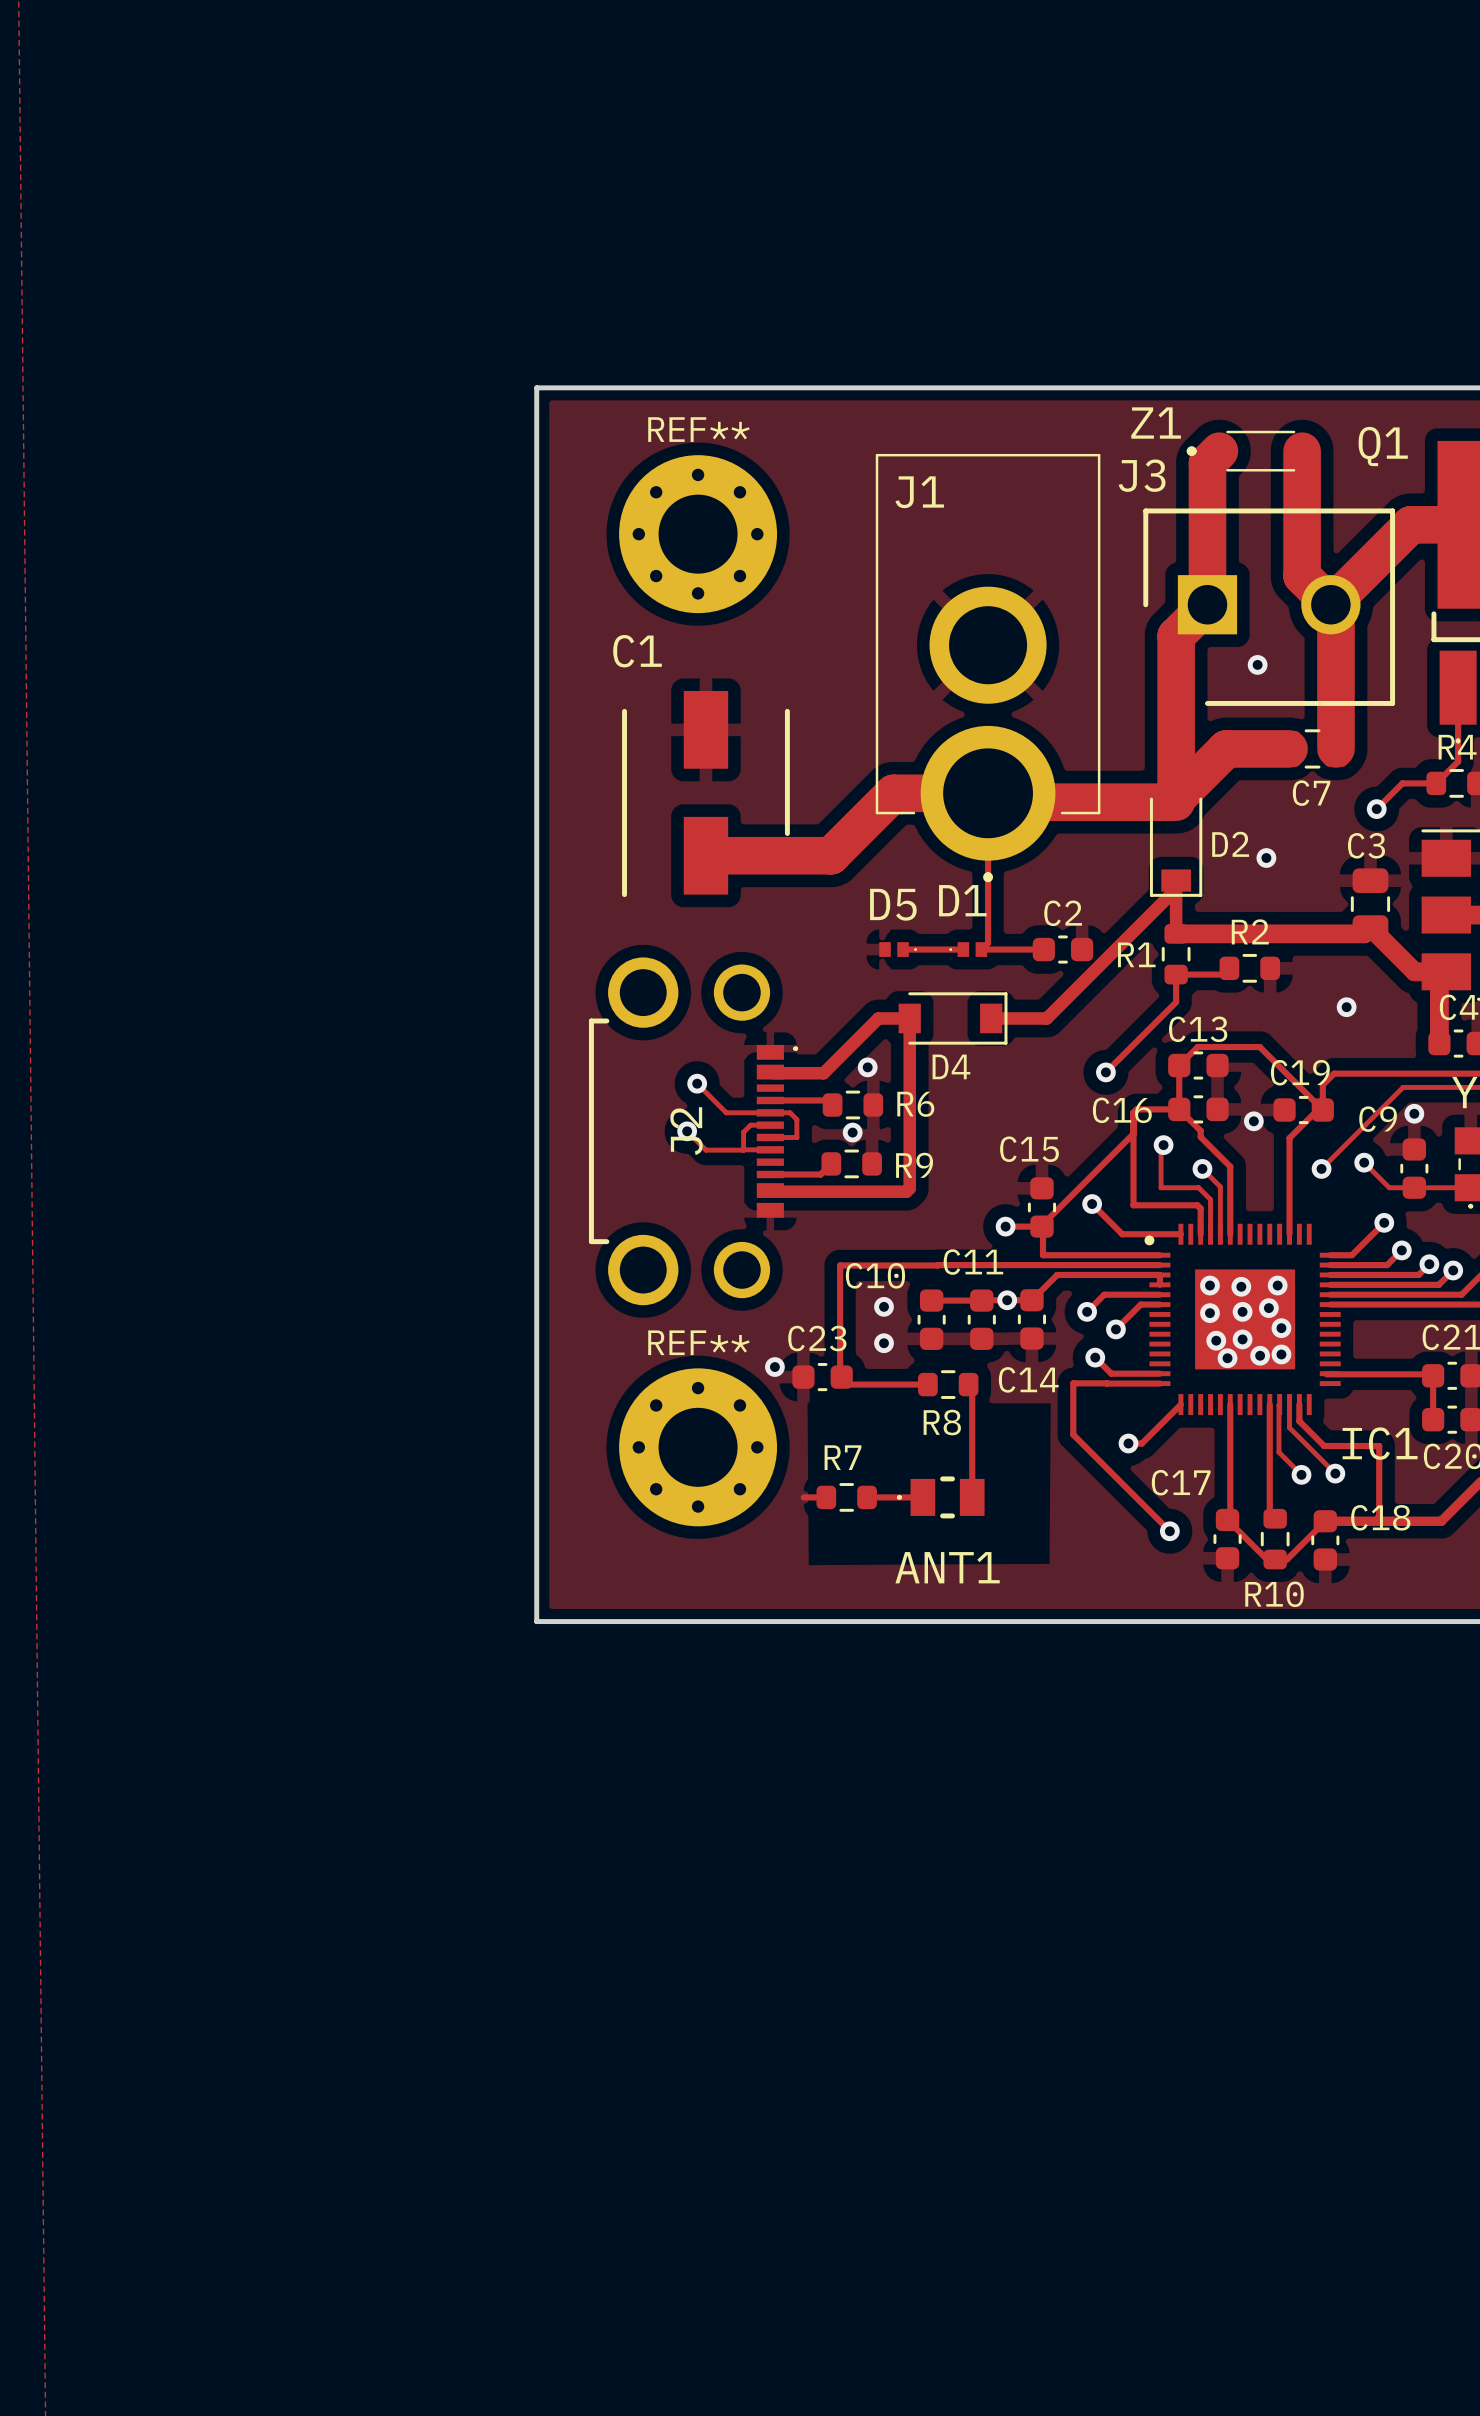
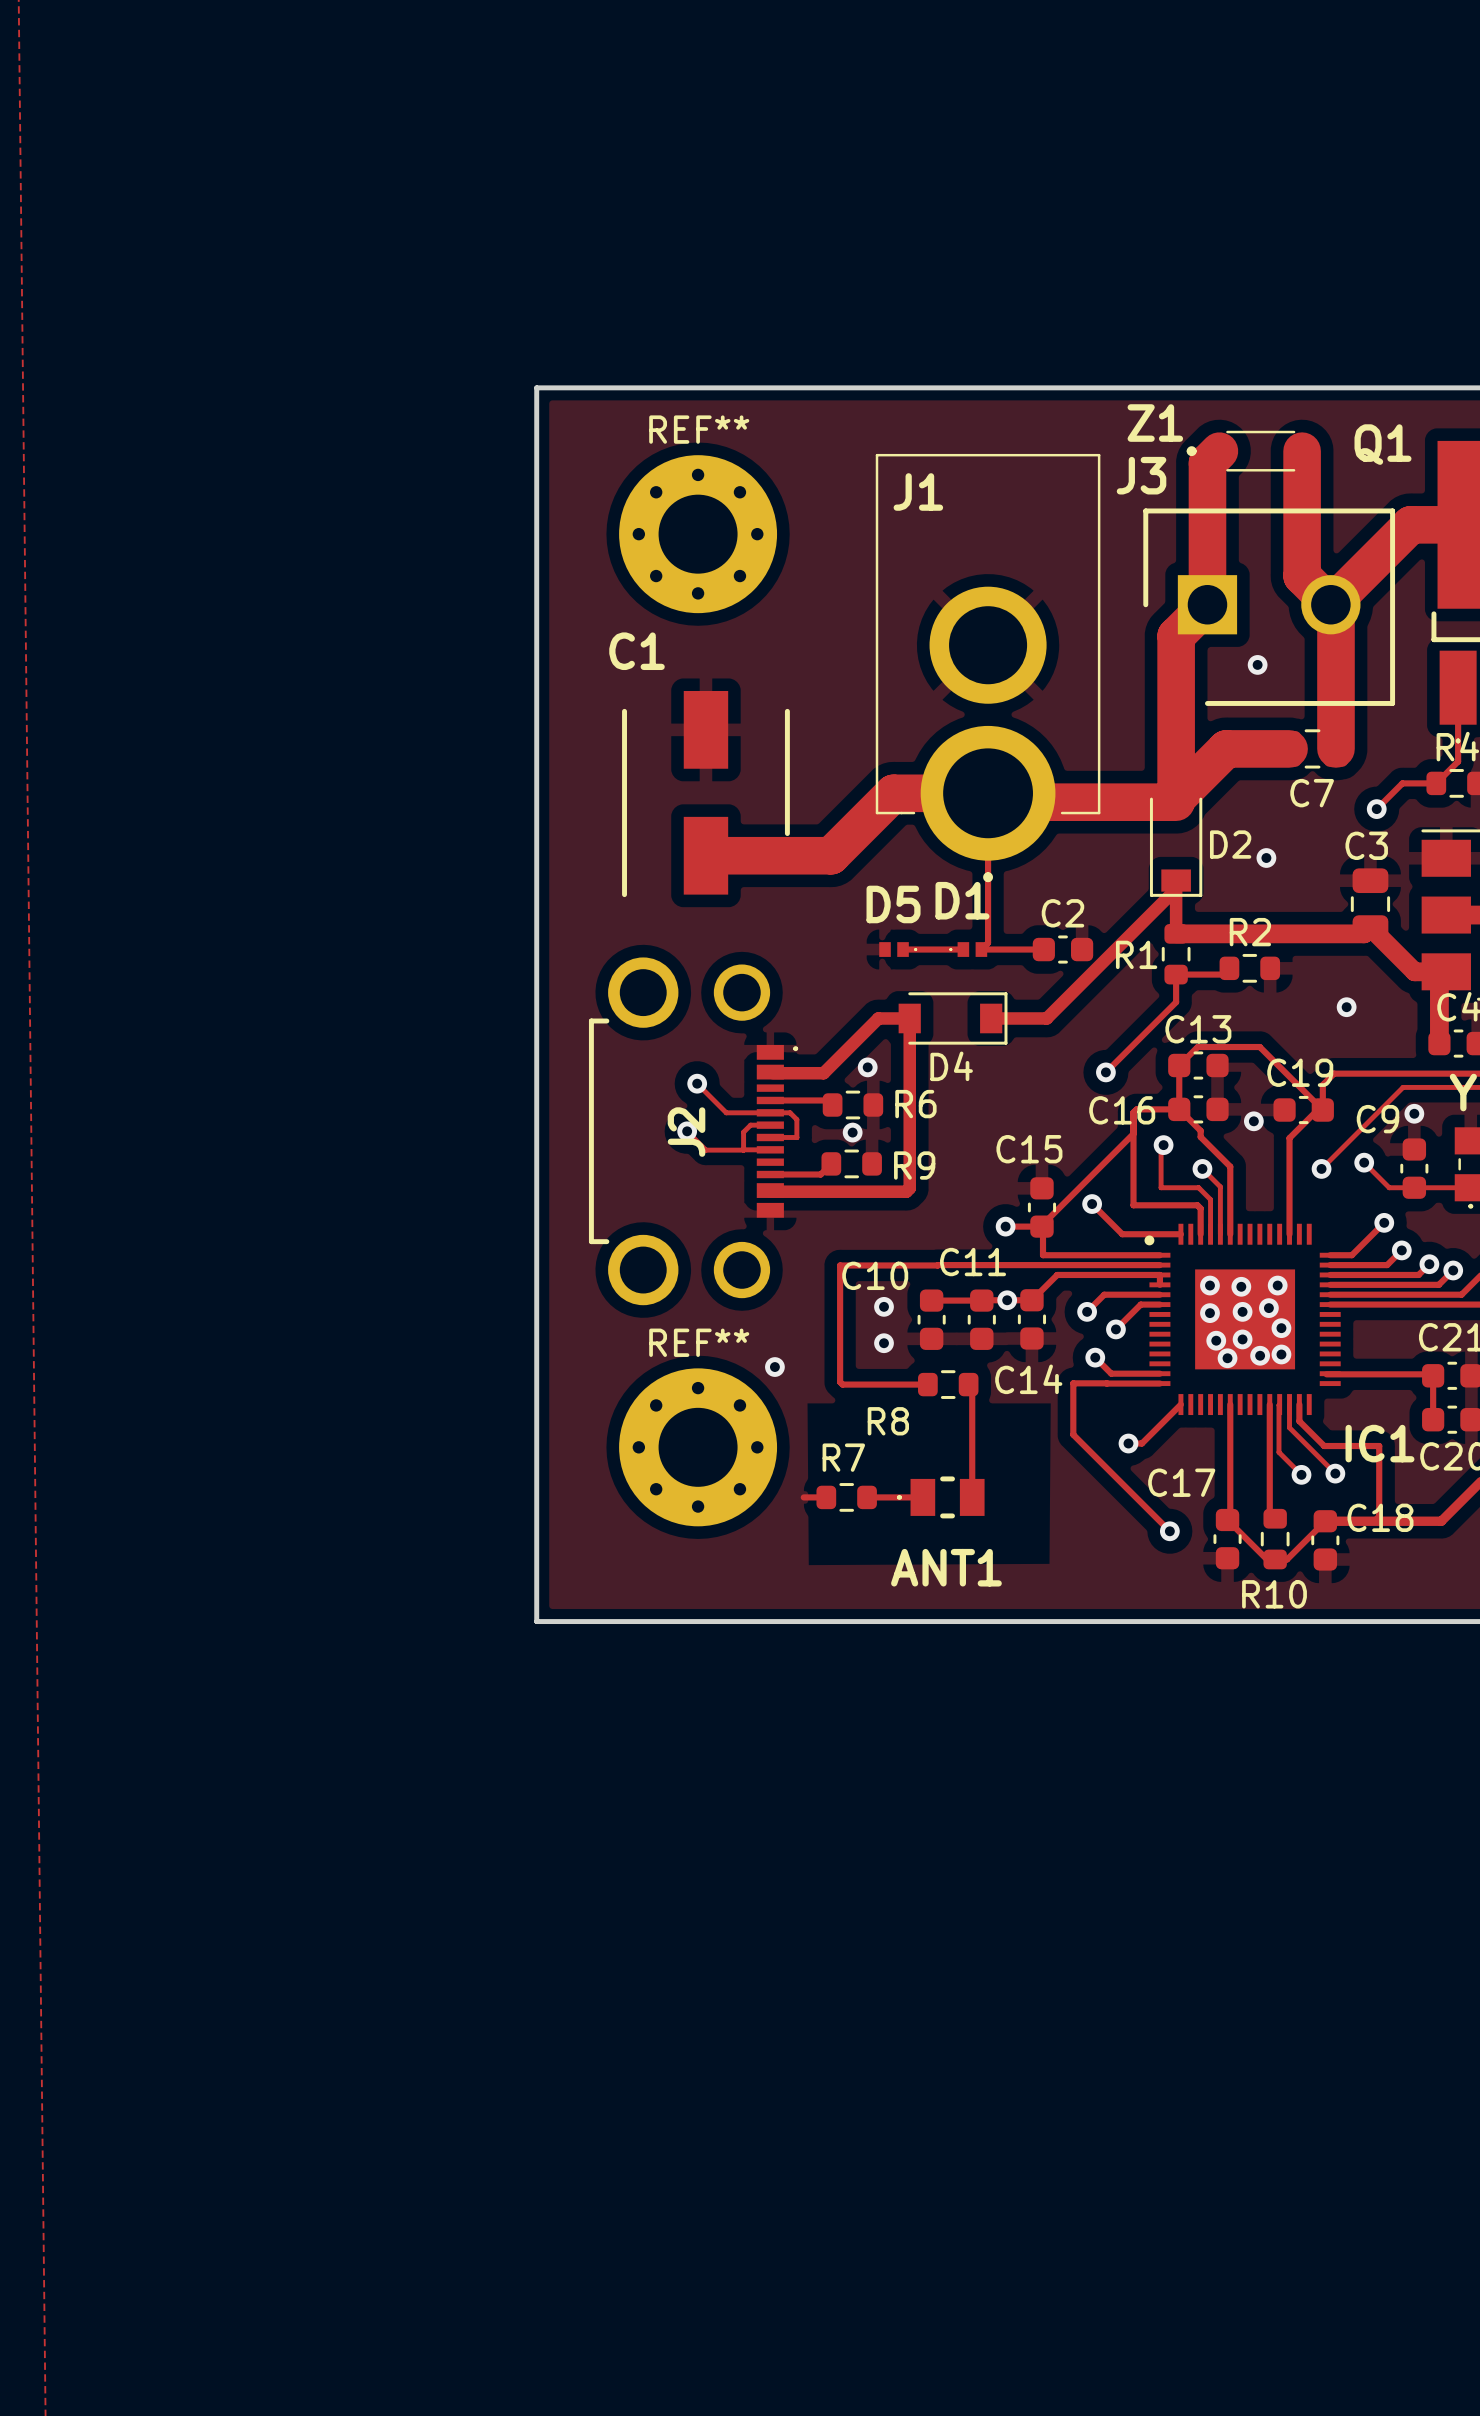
C23: (822, 1377) -> none
R8 name position: R8 (942, 1422) -> R8 (888, 1421)

